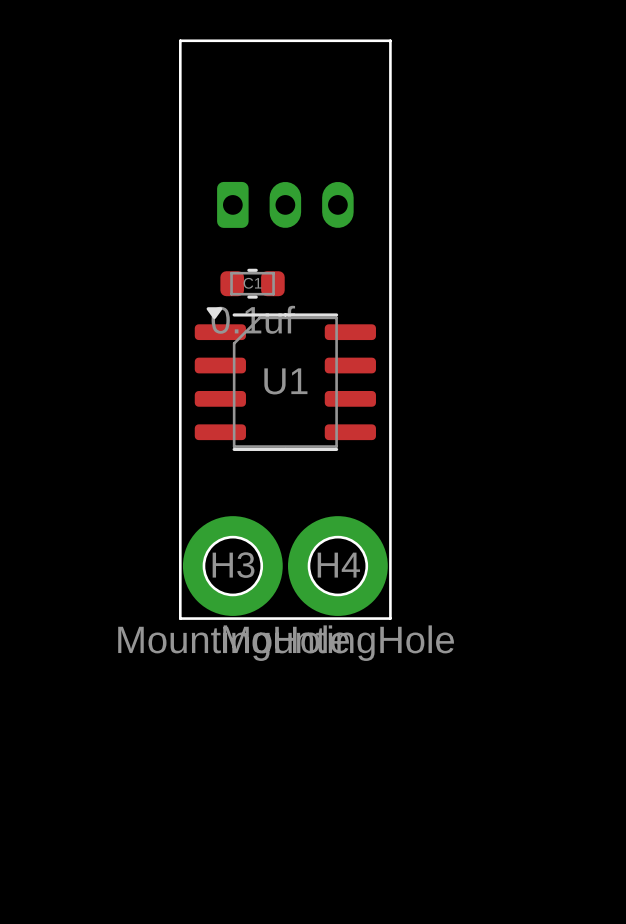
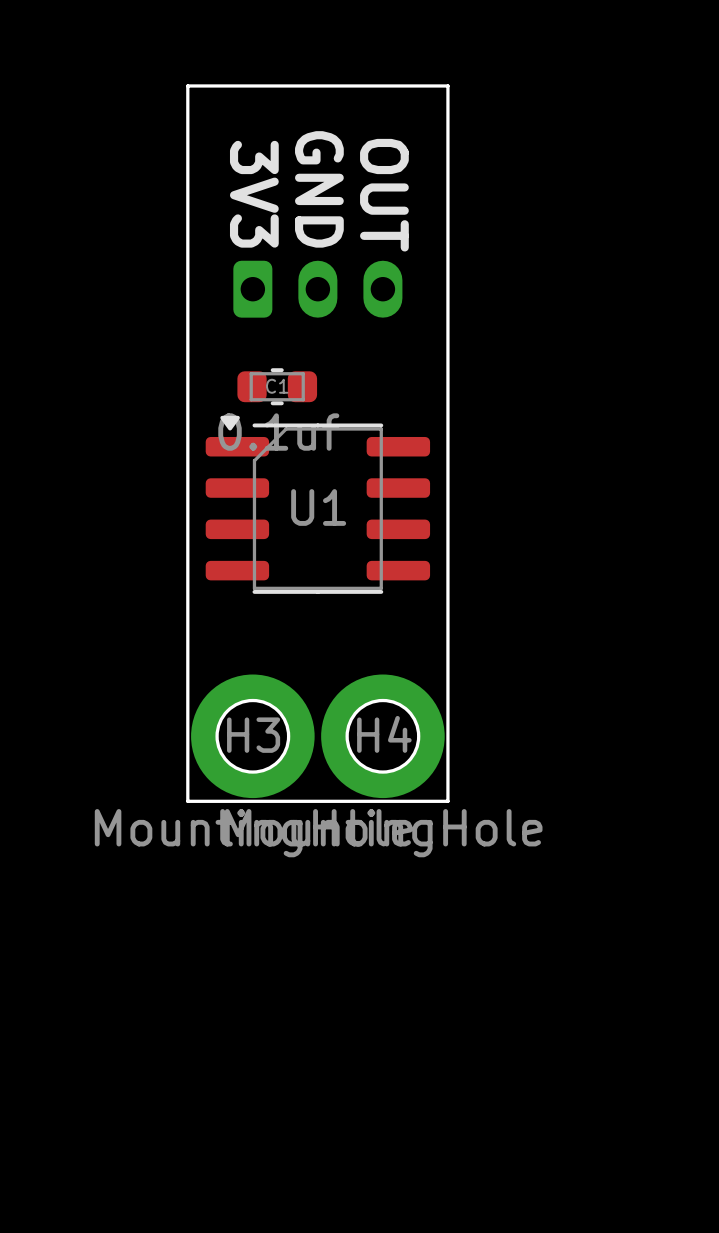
text: none -> GND (319, 189)
text: none -> OUT (384, 195)
text: none -> 3V3 (254, 194)

